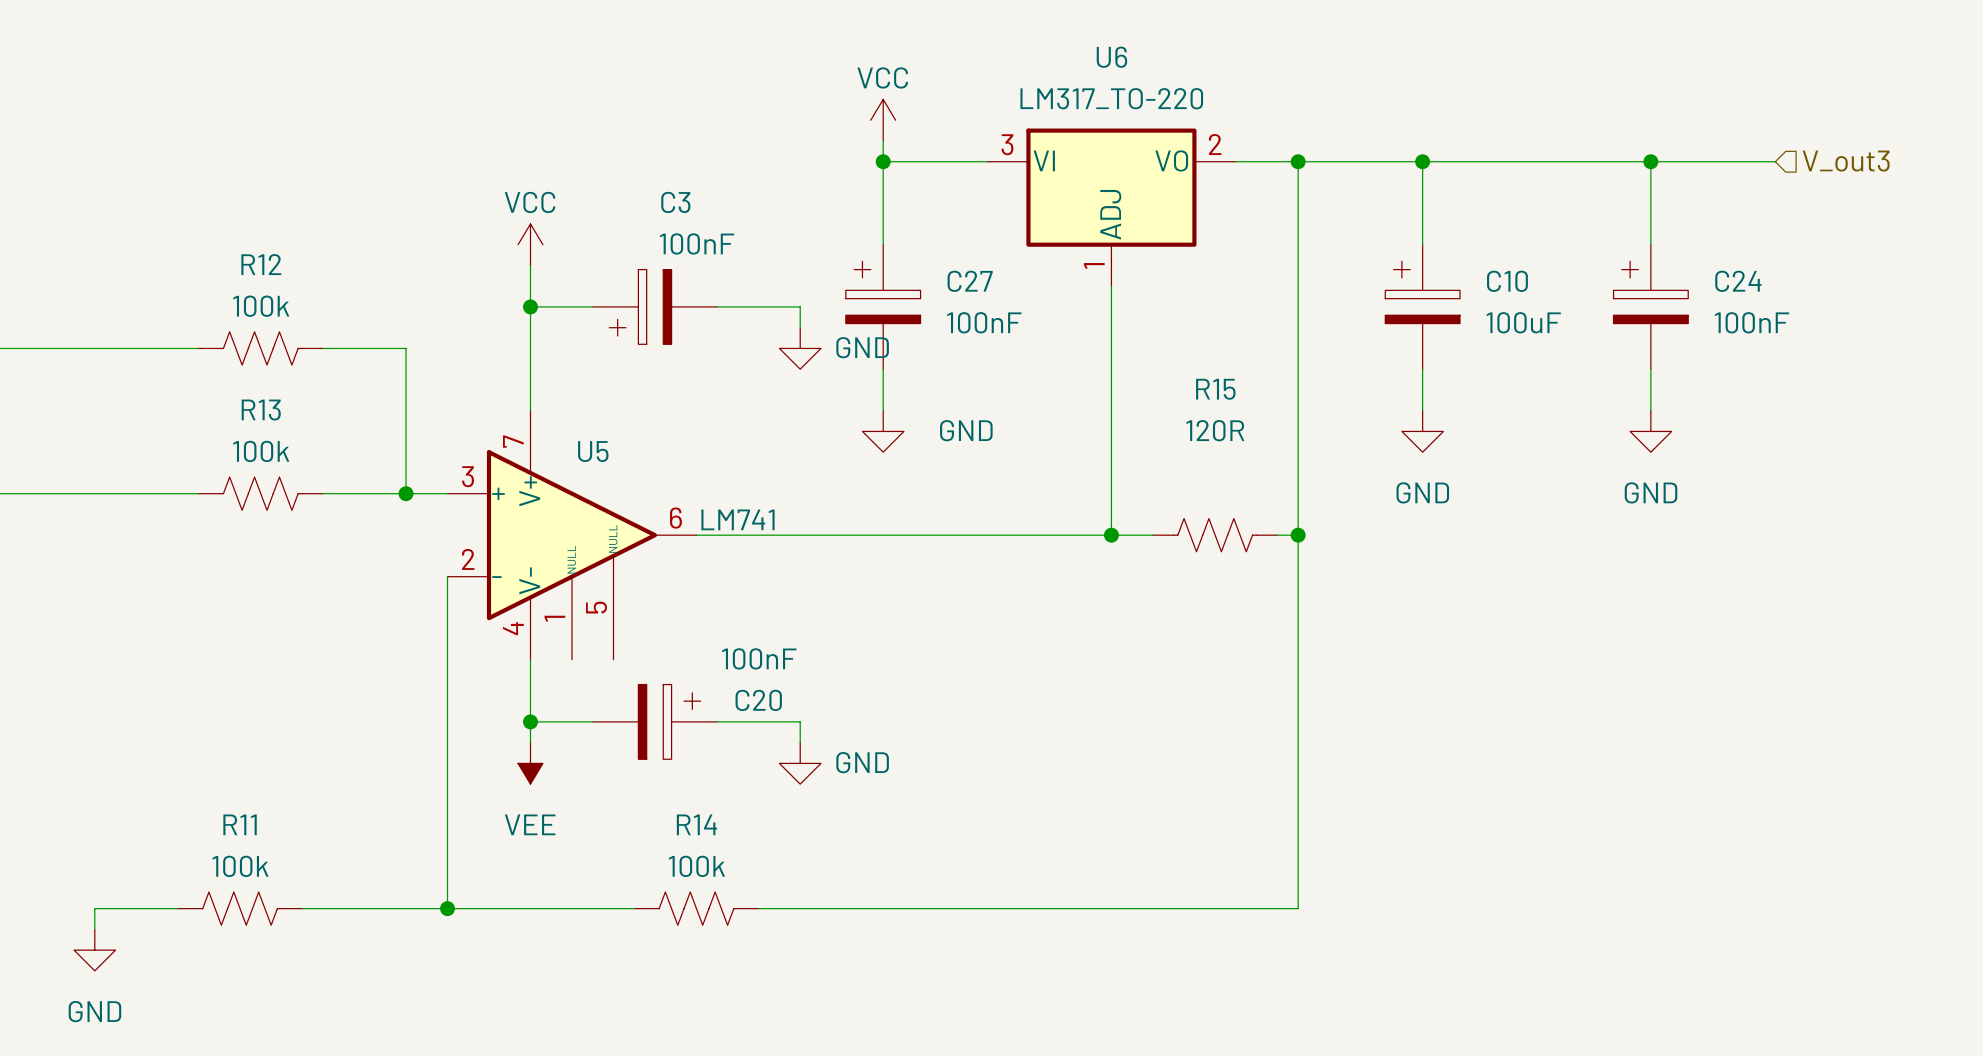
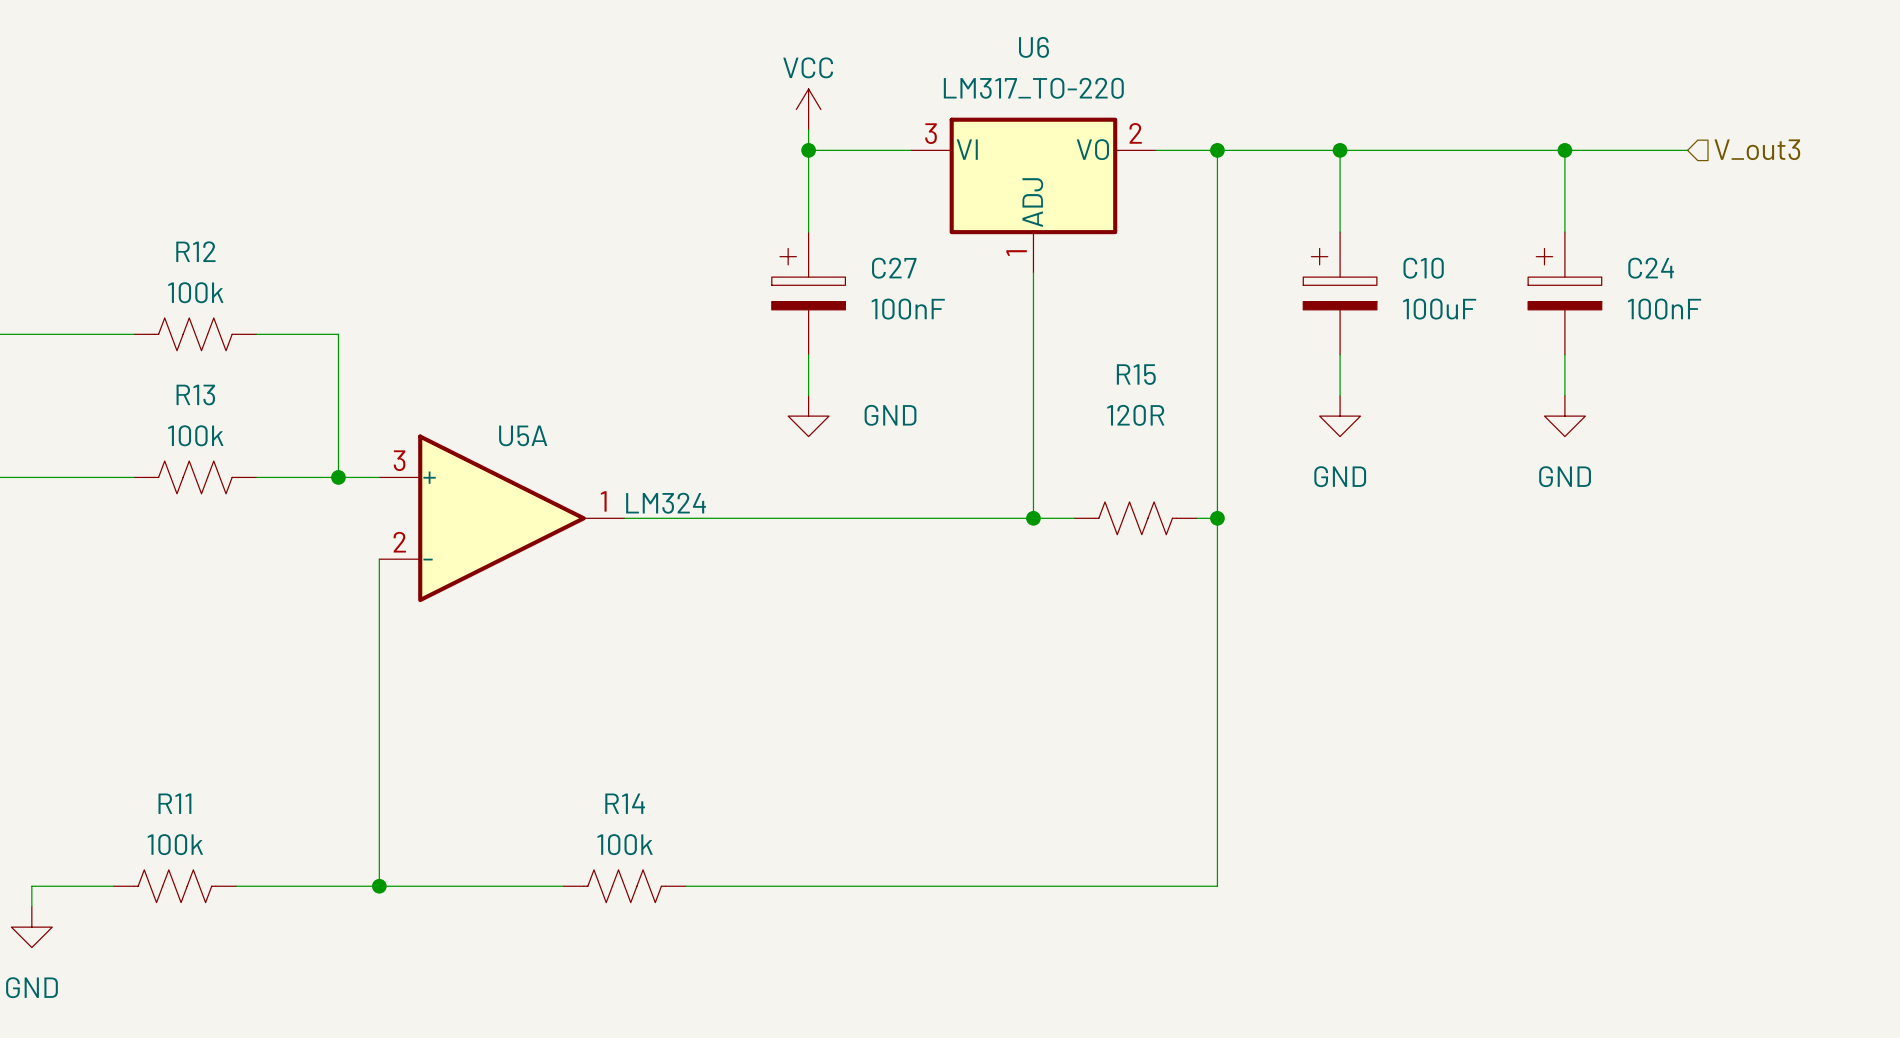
power symbol: VCC (530, 244) -> none
wire: (530, 265) (530, 410) -> none
wire: (530, 306) (592, 306) -> none
junction: (530, 306) -> none
C3: 100nF (654, 306) -> none
wire: (717, 306) (800, 306) (800, 327) -> none
power symbol: GND (800, 348) -> none
U5: LM741 (571, 535) -> none
U5A: none -> LM324 (501, 518)
wire: (530, 659) (530, 742) -> none
wire: (530, 721) (592, 721) -> none
junction: (530, 721) -> none
C20: 100nF (654, 721) -> none
wire: (717, 721) (800, 721) (800, 742) -> none
power symbol: VEE (530, 763) -> none
power symbol: GND (800, 763) -> none

